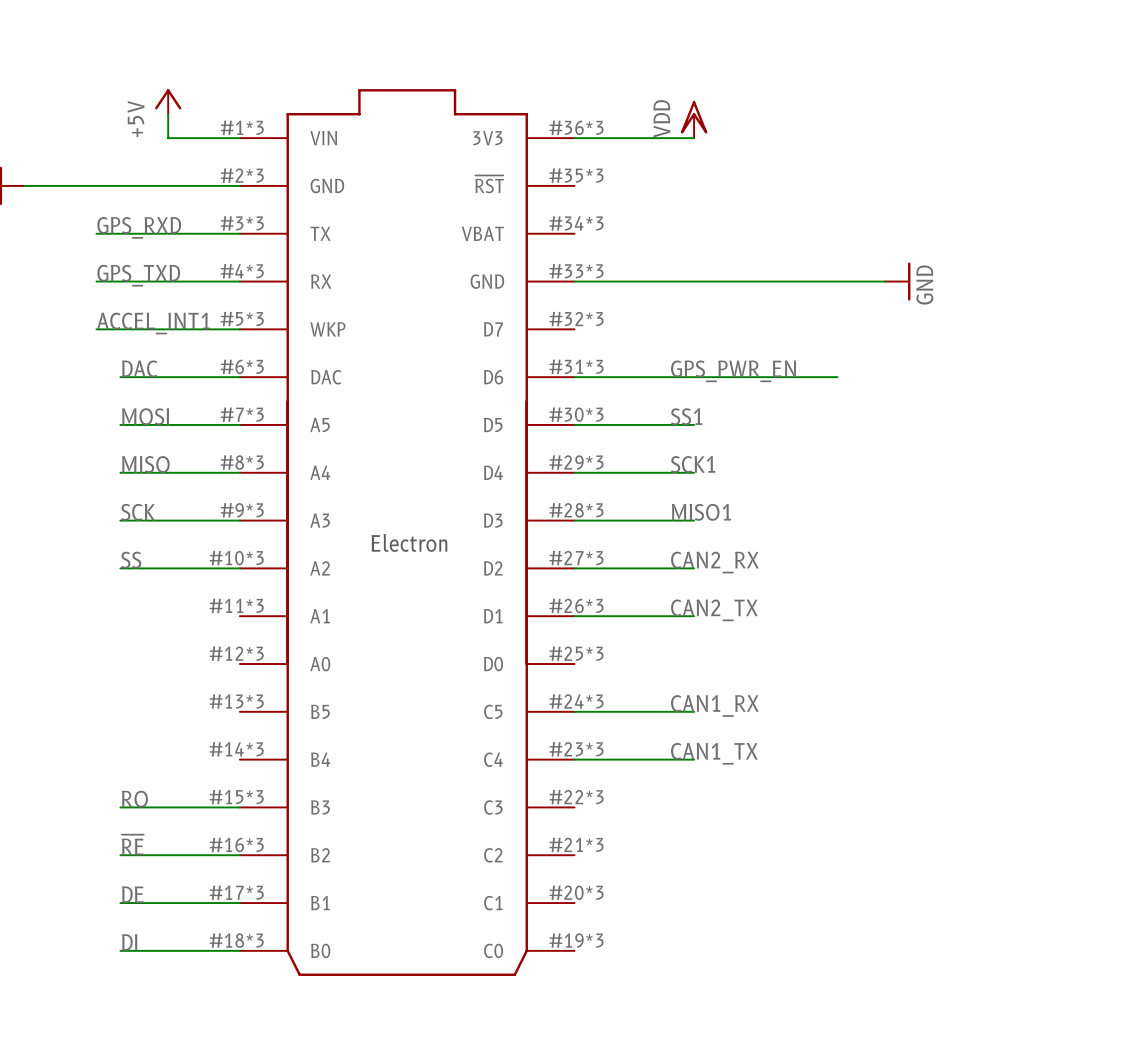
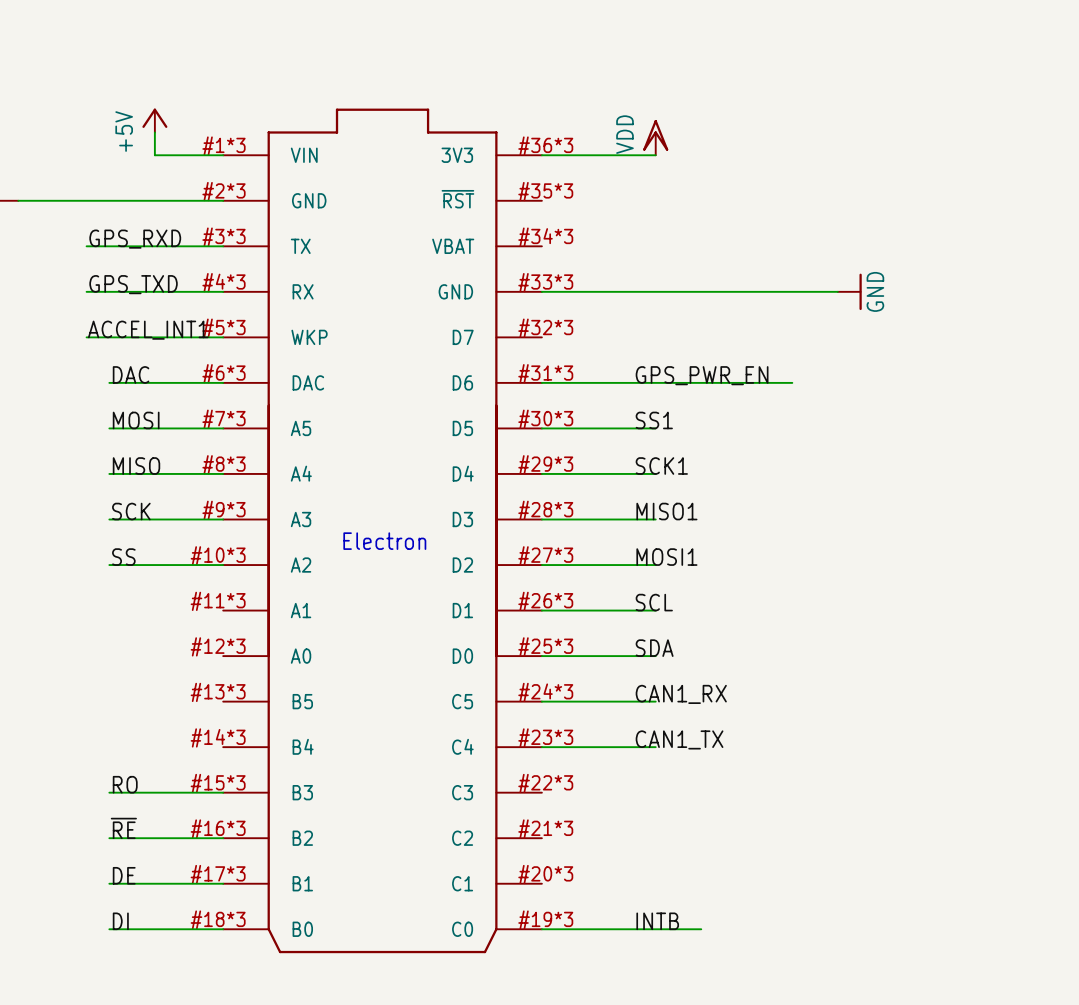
label: CAN2_RX (714, 562) -> MOSI1 (666, 557)
label: CAN2_TX (714, 610) -> SCL (654, 602)
label: none -> SDA (654, 648)
wire: none -> (541, 656) (655, 656)
label: none -> INTB (657, 921)
wire: none -> (541, 929) (701, 929)

